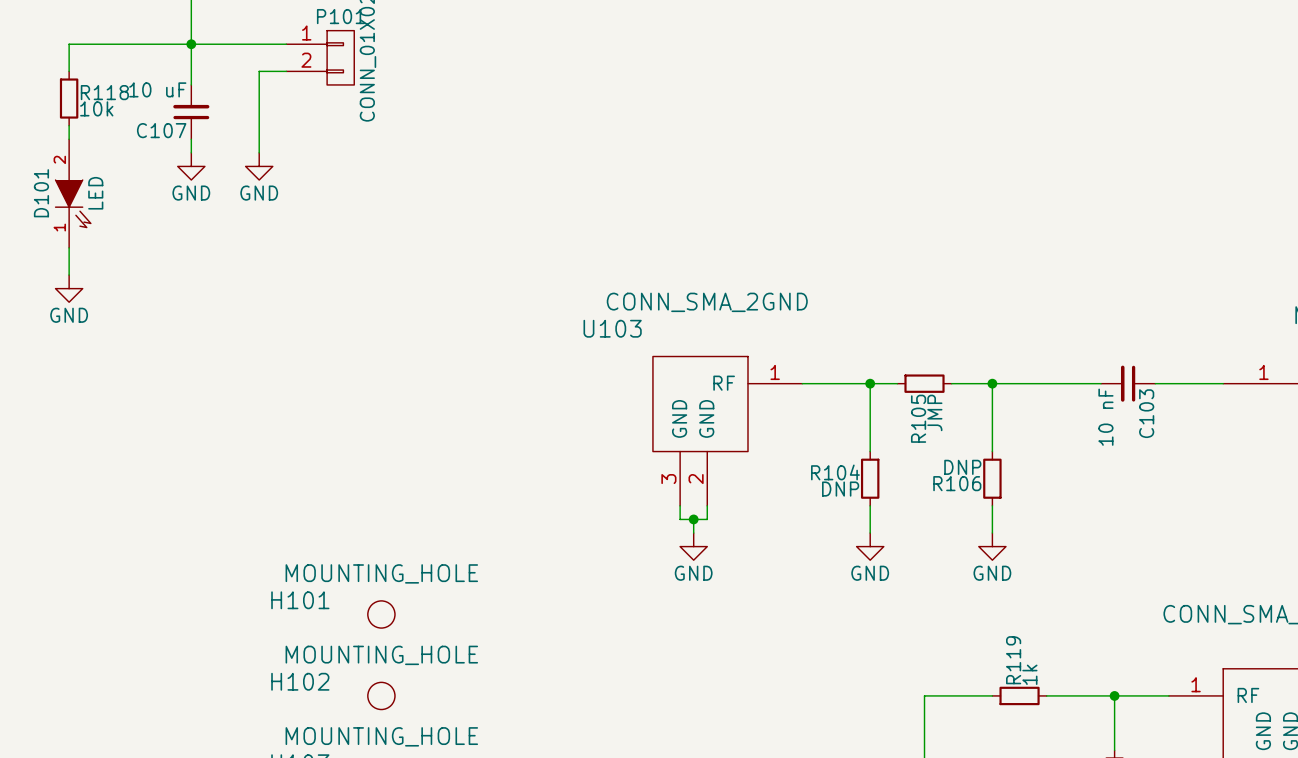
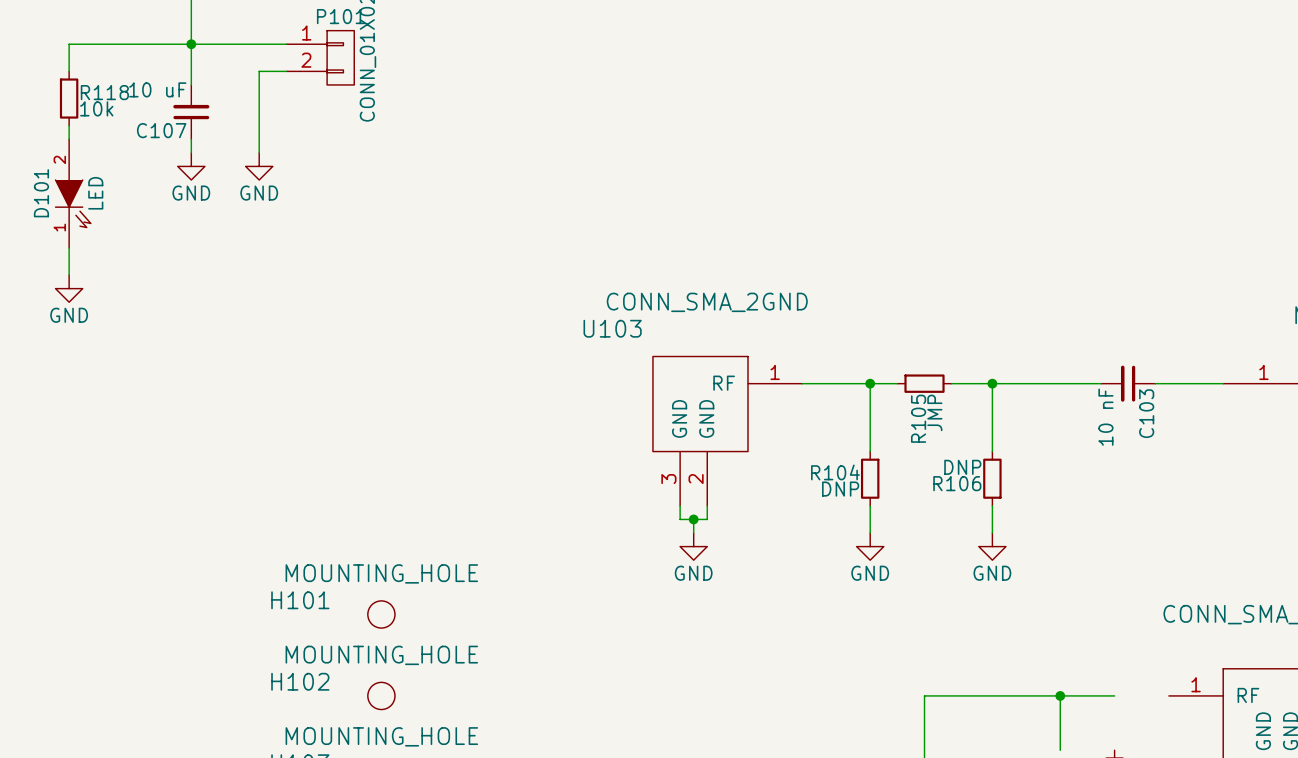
wire: none -> (992, 695) (1046, 695)
R119: 1k (1019, 695) -> none
wire: none -> (1060, 695) (1060, 750)
junction position: (1114, 695) -> (1060, 695)
wire: (1168, 695) (1114, 695) (1114, 750) -> none

